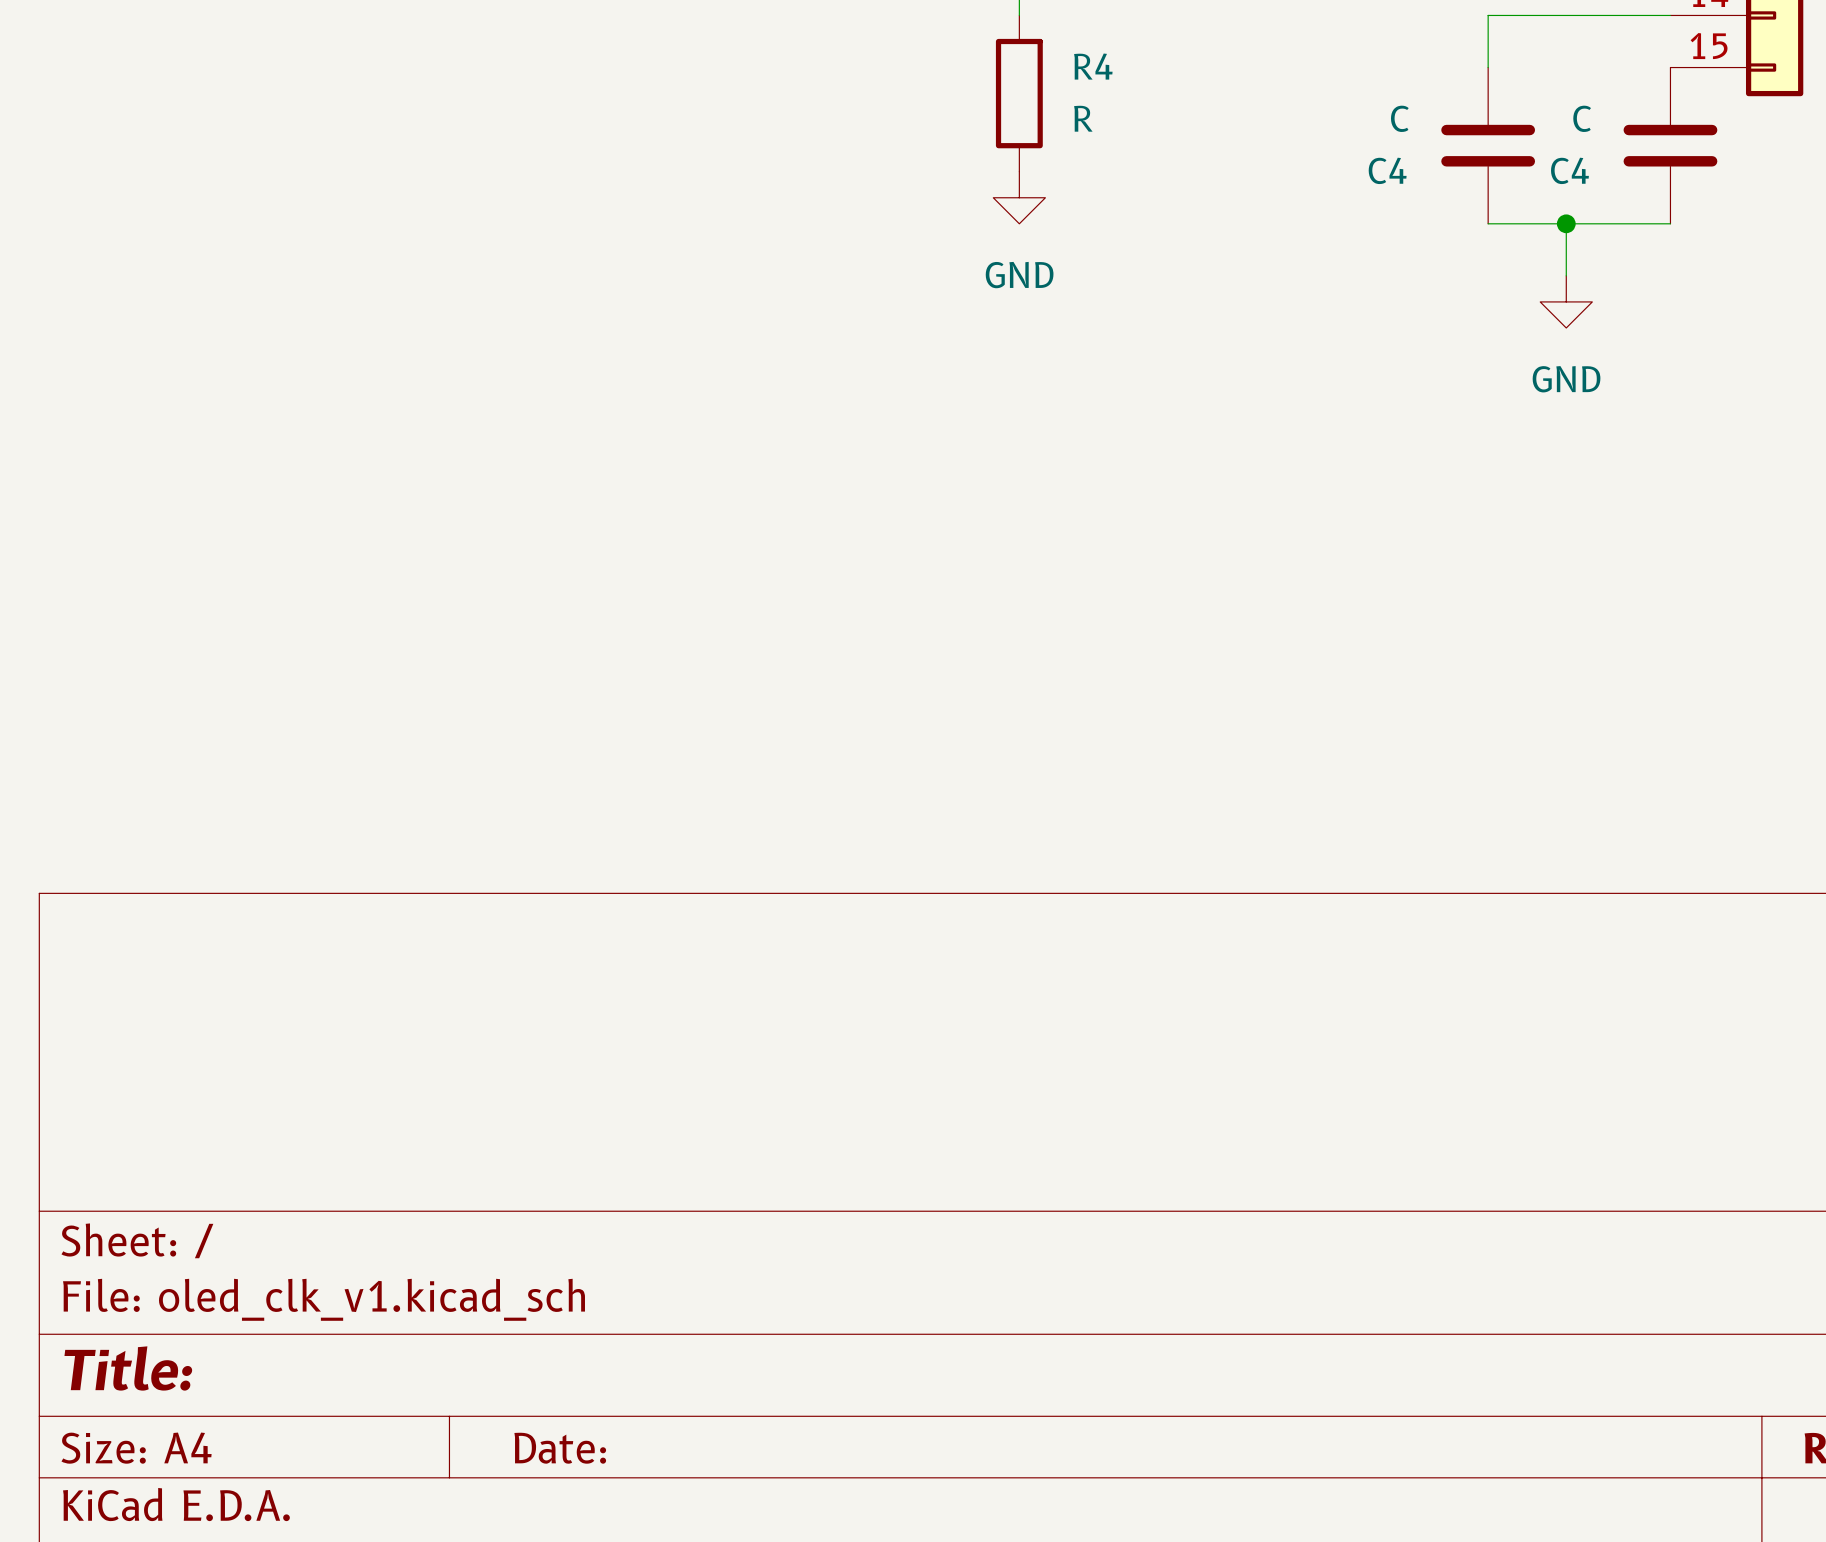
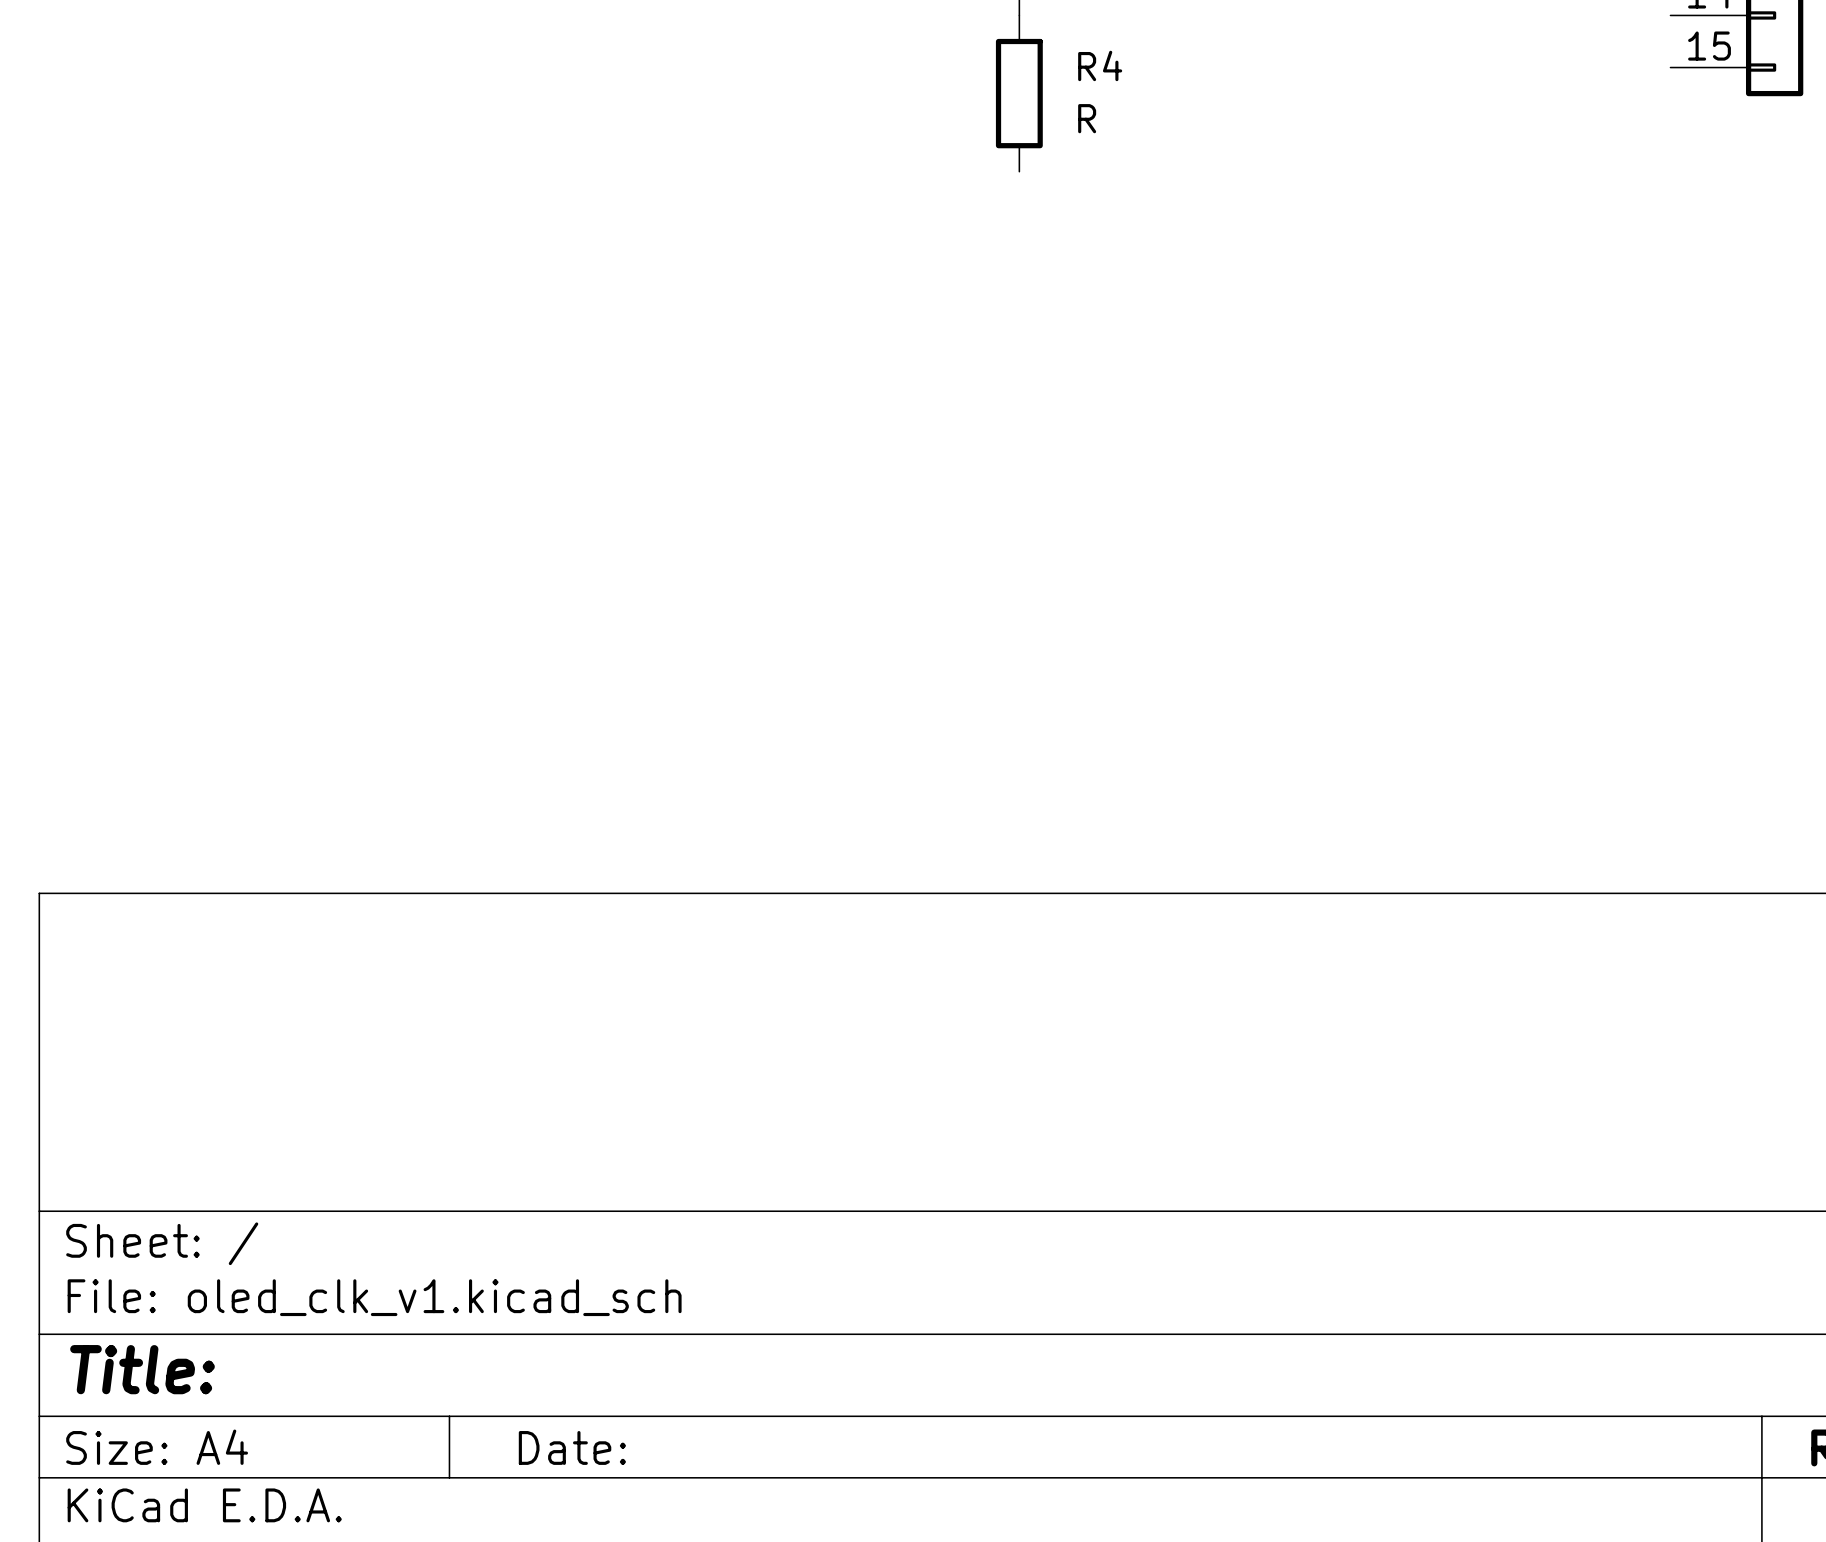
wire: (1670, 15) (1488, 15) (1488, 67) -> none
C4: C (1488, 145) -> none
C4: C (1670, 145) -> none
power symbol: GND (1019, 197) -> none
wire: (1488, 223) (1670, 223) -> none
wire: (1566, 223) (1566, 275) -> none
junction: (1566, 223) -> none
power symbol: GND (1566, 301) -> none

